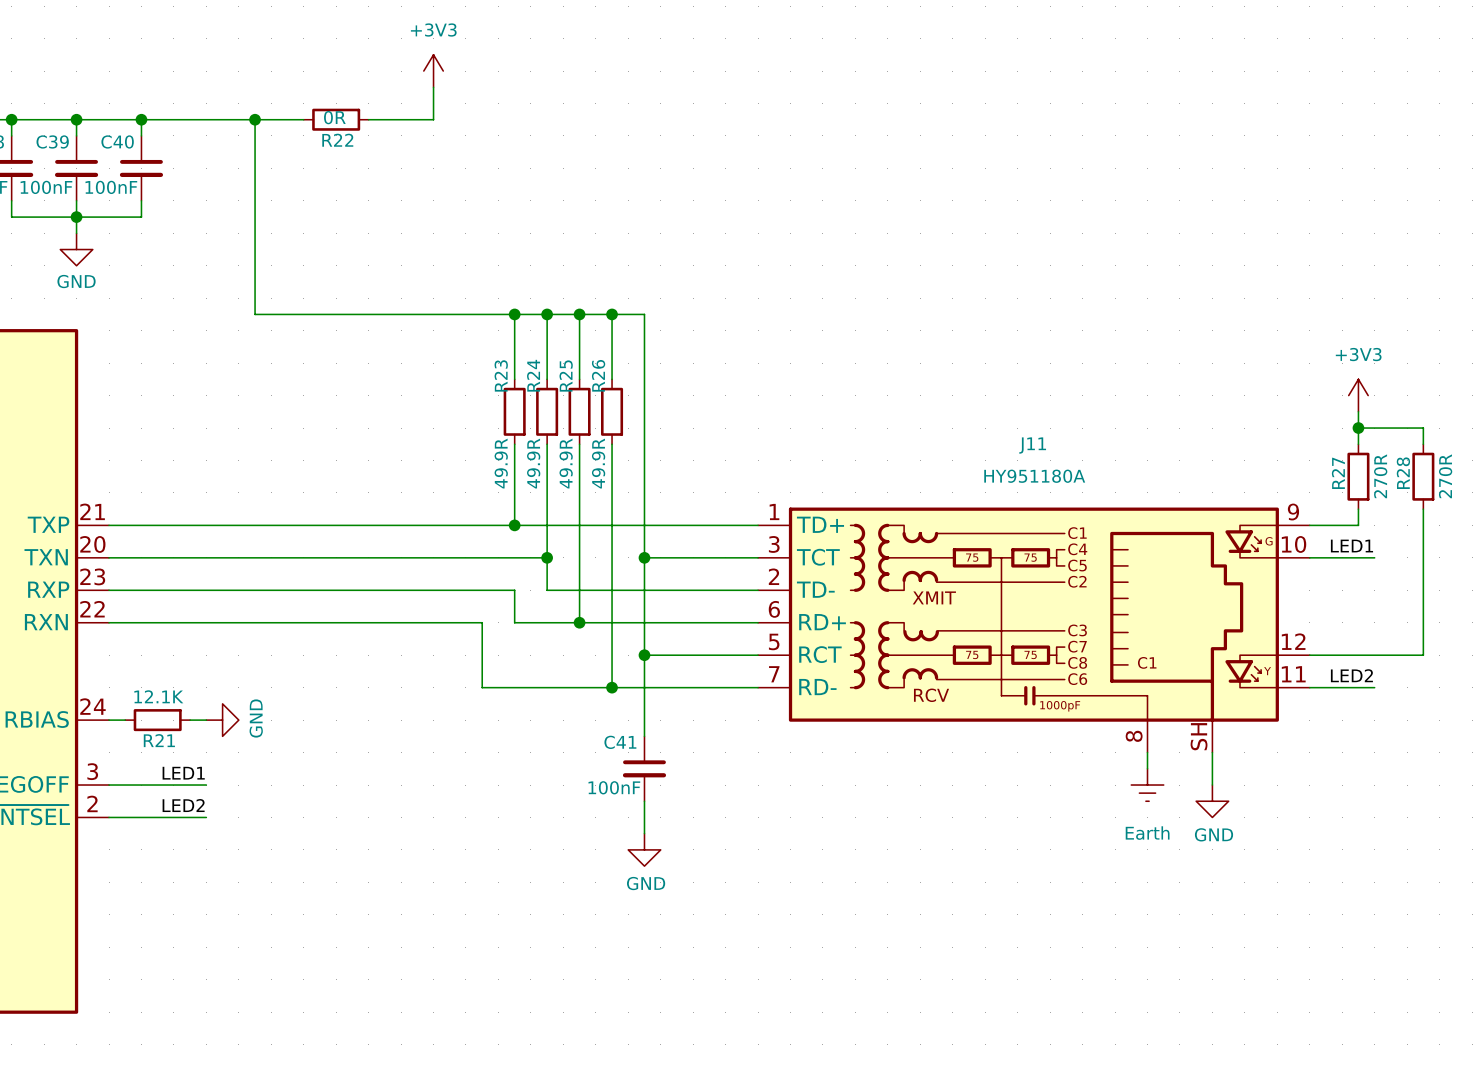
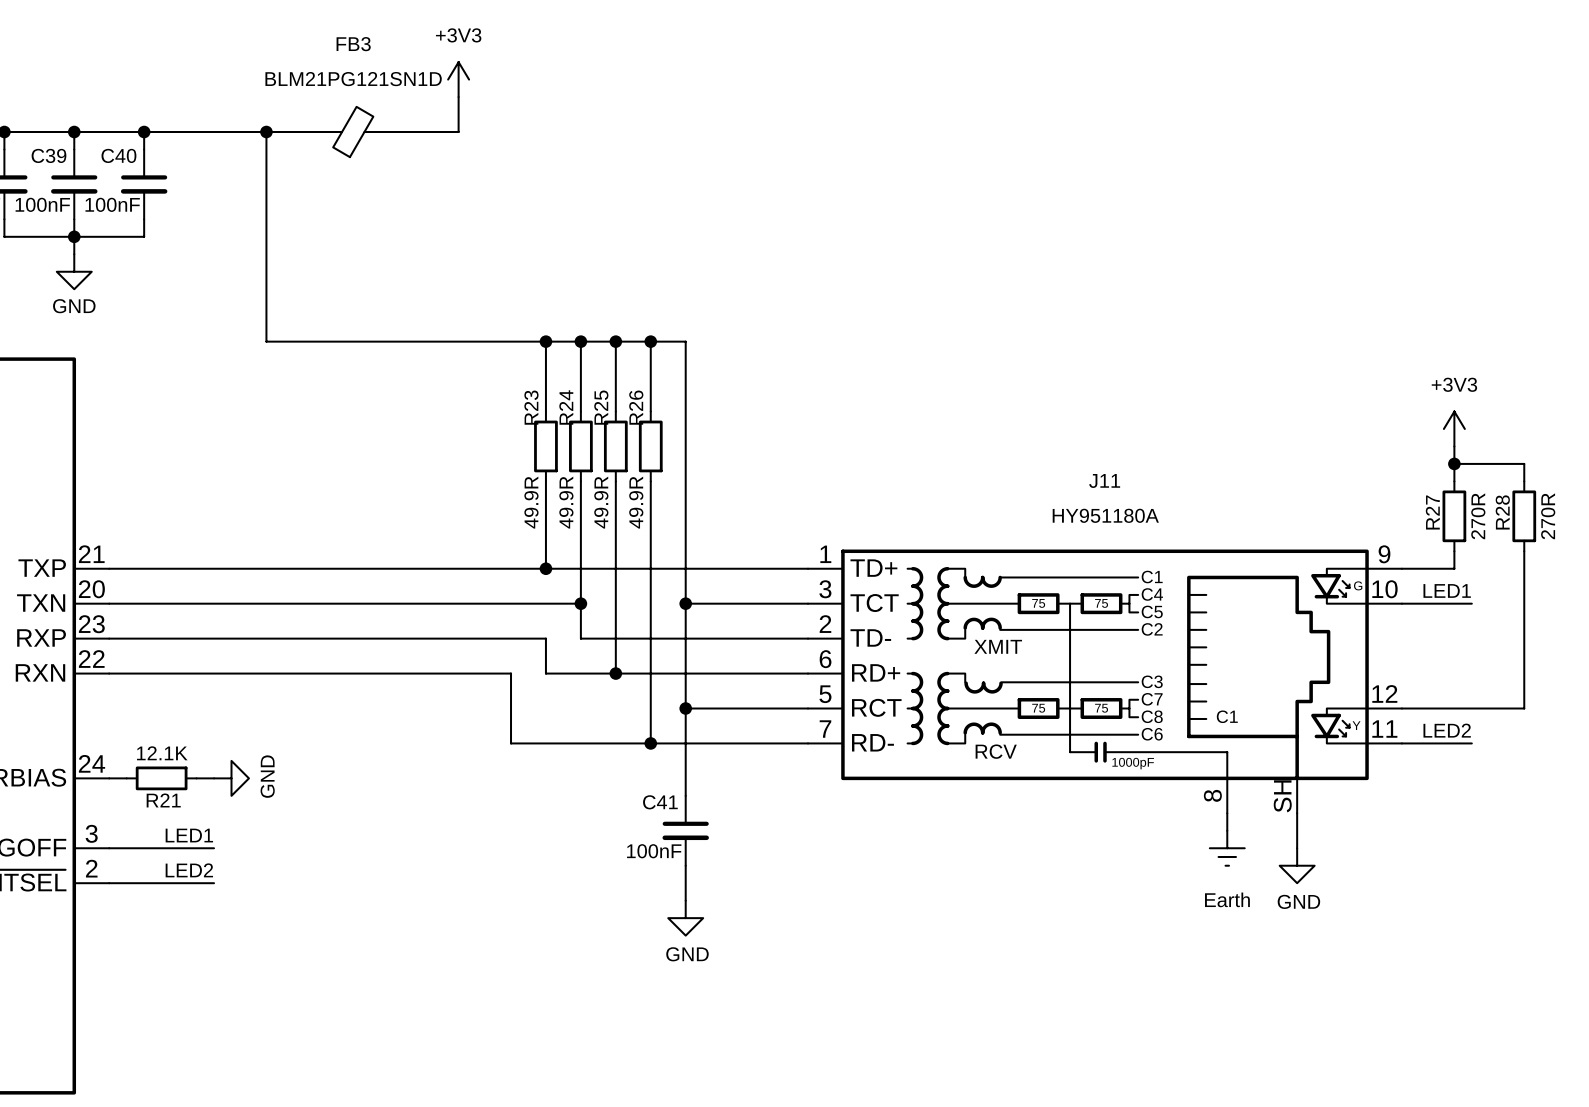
R22: 0R (336, 119) -> none
FB3: none -> BLM21PG121SN1D (353, 132)

